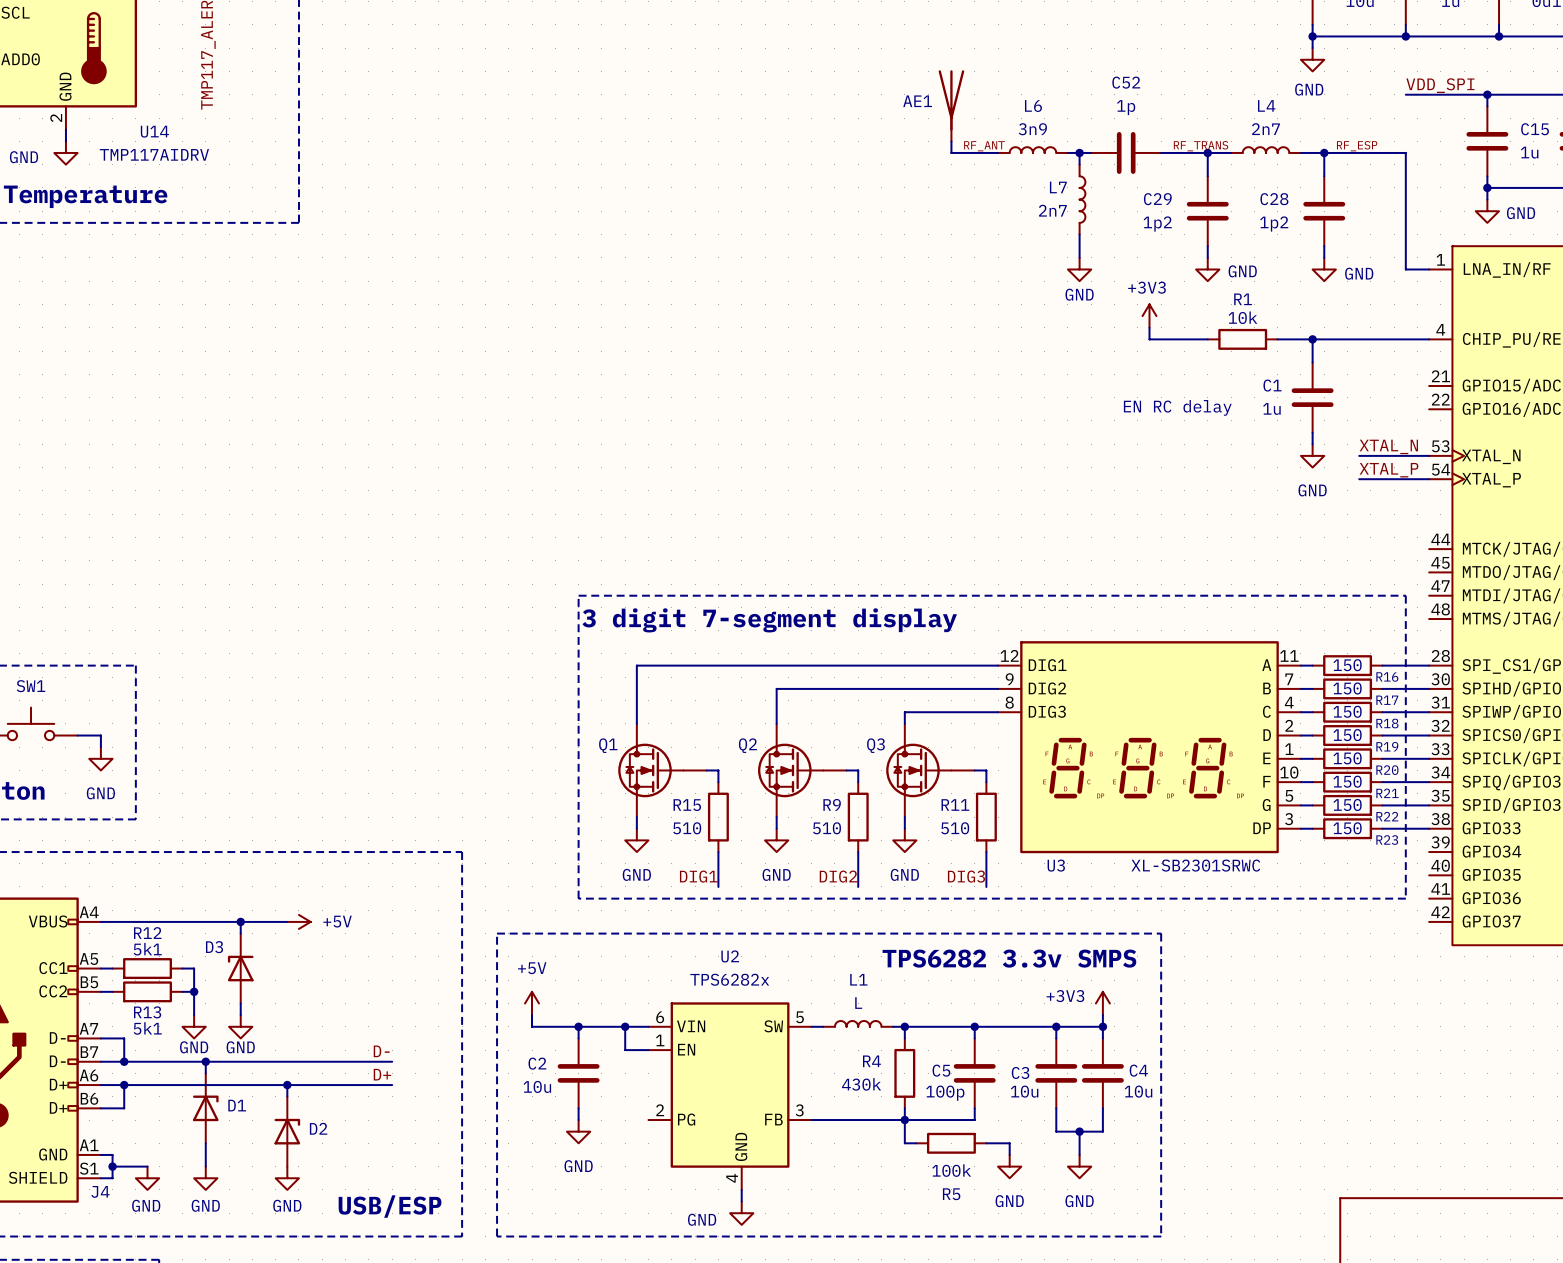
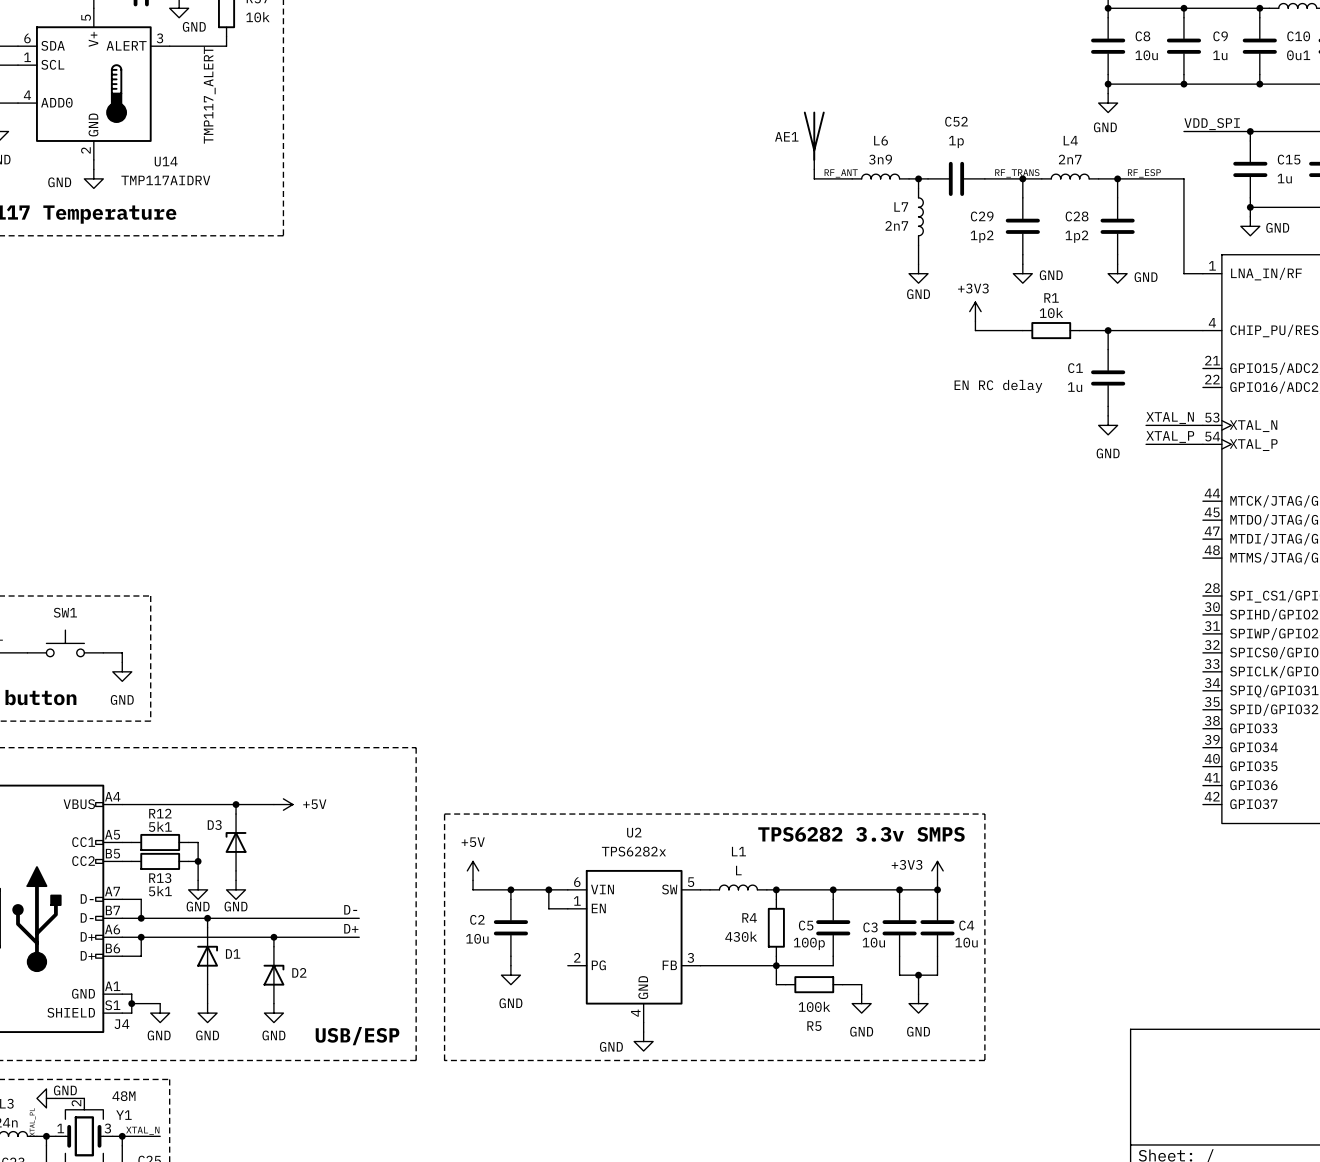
line: (578, 595) (1405, 595) (1405, 898) (578, 898) (578, 595) -> none
text: 3 digit 7-segment display (769, 620) -> none
wire: (998, 665) (636, 665) (636, 723) -> none
wire: (1300, 665) (1312, 665) -> none
R16: 150 (1347, 665) -> none
wire: (1382, 665) (1429, 665) -> none
wire: (998, 688) (776, 688) (776, 723) -> none
wire: (1300, 688) (1312, 688) -> none
R17: 150 (1347, 688) -> none
wire: (1382, 688) (1429, 688) -> none
wire: (998, 712) (904, 712) (904, 723) -> none
wire: (1300, 712) (1312, 712) -> none
R18: 150 (1347, 712) -> none
wire: (1382, 712) (1429, 712) -> none
wire: (1300, 735) (1312, 735) -> none
R19: 150 (1347, 735) -> none
wire: (1382, 735) (1429, 735) -> none
U3: XL-SB2301SRWC (1149, 747) -> none
wire: (1300, 758) (1312, 758) -> none
R20: 150 (1347, 758) -> none
wire: (1382, 758) (1429, 758) -> none
Q1: (662, 770) -> none
wire: (706, 770) (718, 770) (718, 782) -> none
Q2: (802, 770) -> none
wire: (846, 770) (858, 770) (858, 782) -> none
Q3: (930, 770) -> none
wire: (974, 770) (986, 770) (986, 782) -> none
wire: (1300, 782) (1312, 782) -> none
R21: 150 (1347, 782) -> none
wire: (1382, 782) (1429, 782) -> none
wire: (1300, 805) (1312, 805) -> none
R22: 150 (1347, 805) -> none
wire: (1382, 805) (1429, 805) -> none
wire: (636, 817) (636, 828) -> none
R15: 510 (718, 817) -> none
wire: (776, 817) (776, 828) -> none
R9: 510 (858, 817) -> none
wire: (904, 817) (904, 828) -> none
R11: 510 (986, 817) -> none
wire: (1300, 828) (1312, 828) -> none
R23: 150 (1347, 828) -> none
wire: (1382, 828) (1429, 828) -> none
power symbol: GND (636, 840) -> none
power symbol: GND (776, 840) -> none
power symbol: GND (904, 840) -> none
wire: (718, 852) (718, 886) -> none
wire: (858, 852) (858, 886) -> none
wire: (986, 852) (986, 886) -> none
label: DIG1 (698, 876) -> none
label: DIG2 (838, 876) -> none
label: DIG3 (966, 876) -> none

